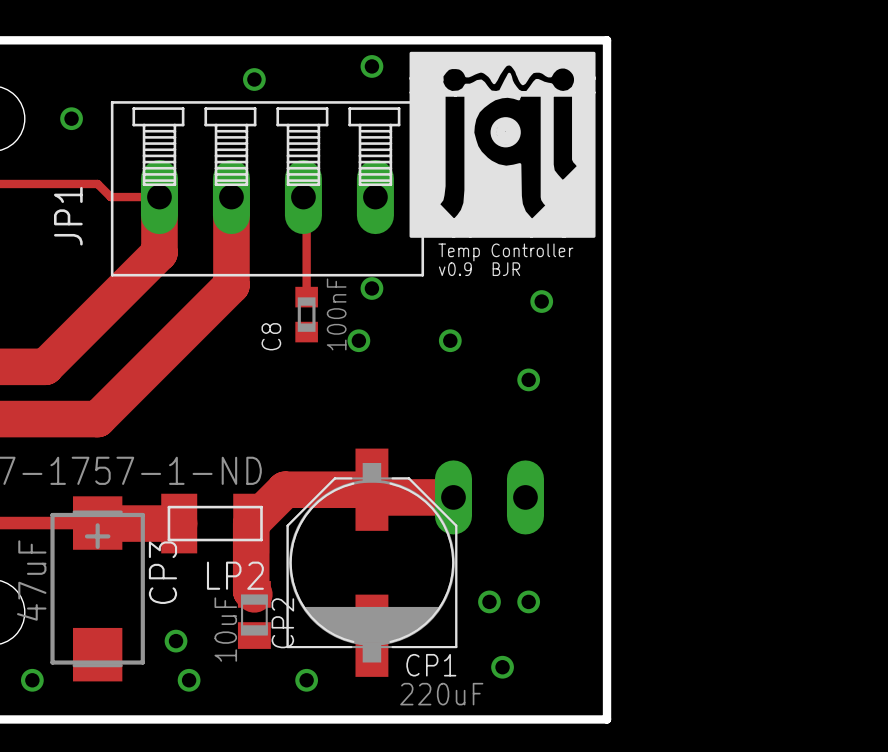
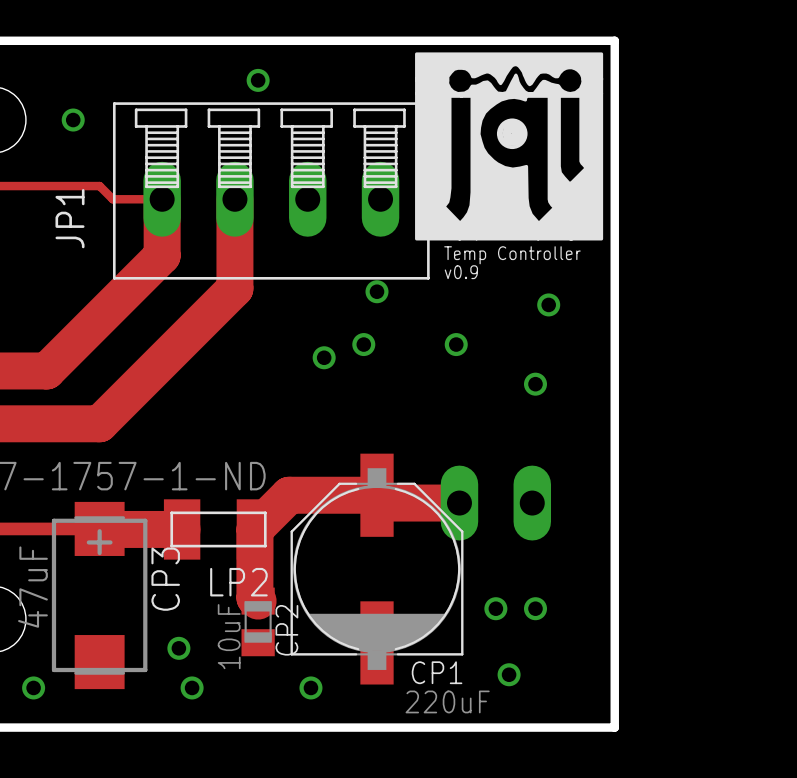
via: (371, 66) -> none
track: (303, 197) (306, 200) (306, 297) -> none
text: v0.9 BJR (479, 269) -> v0.9 (461, 272)
C8: 100nF (306, 314) -> none
via: none -> (324, 357)

